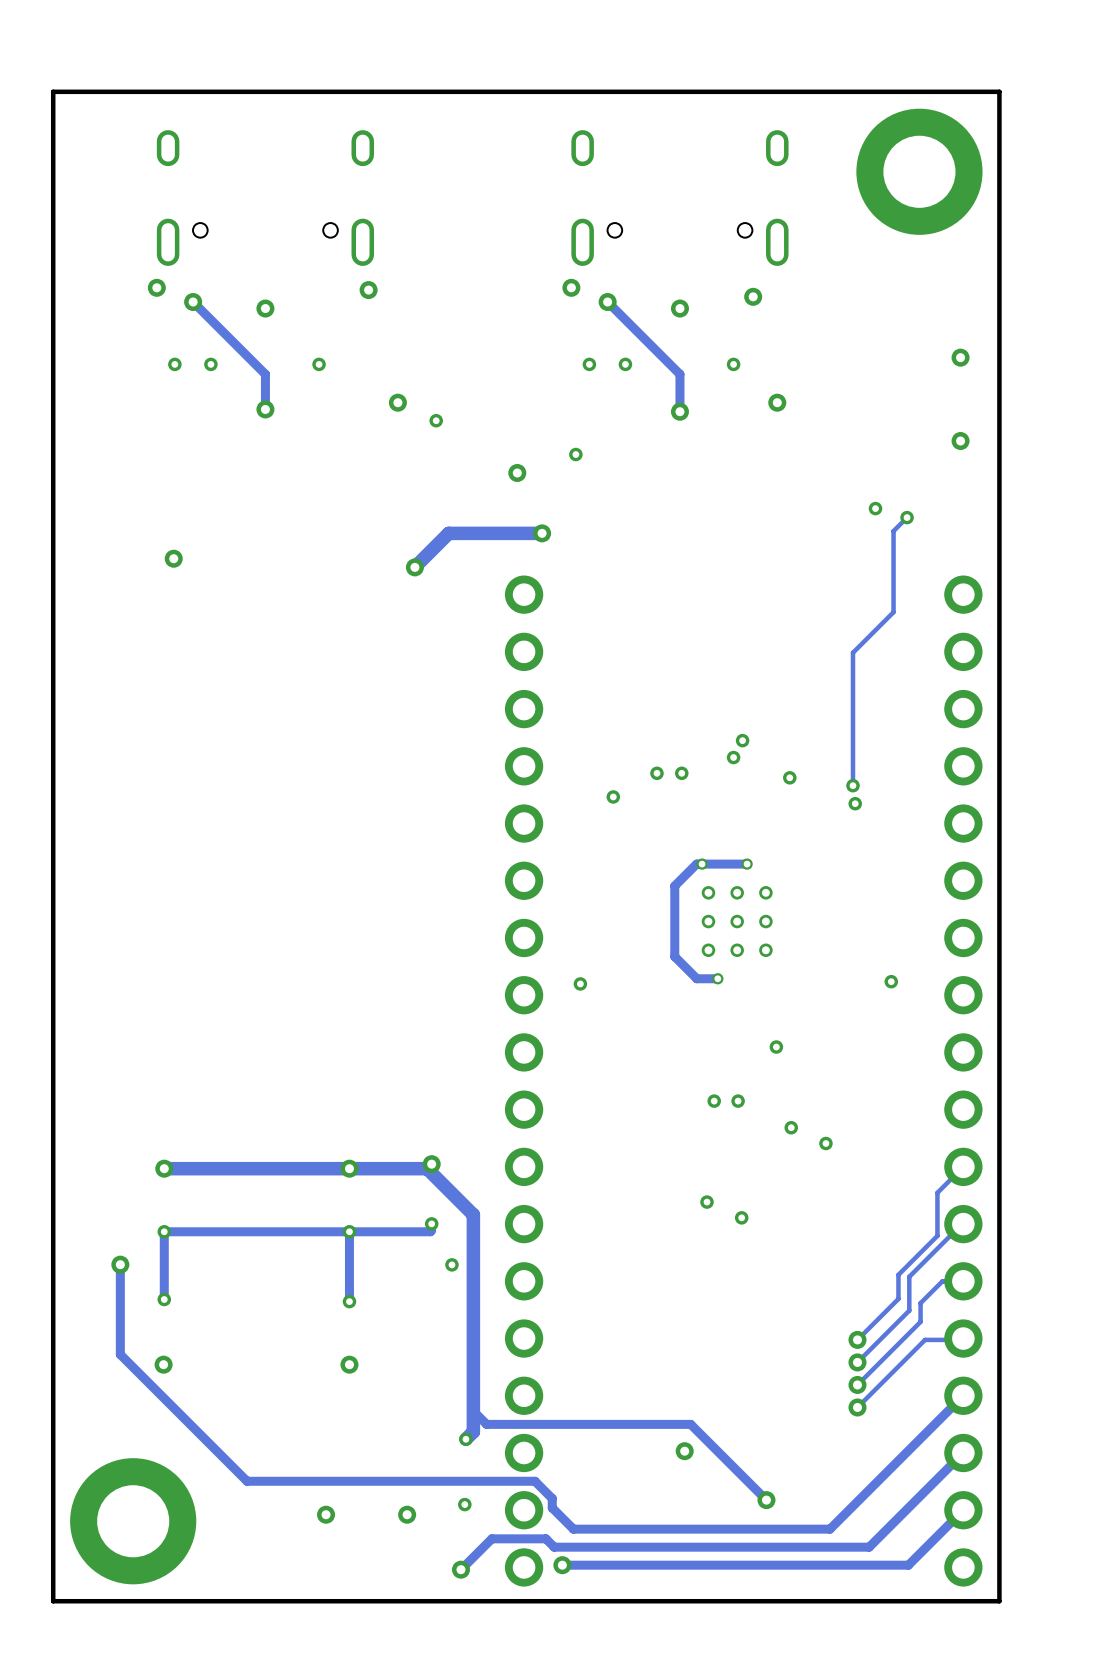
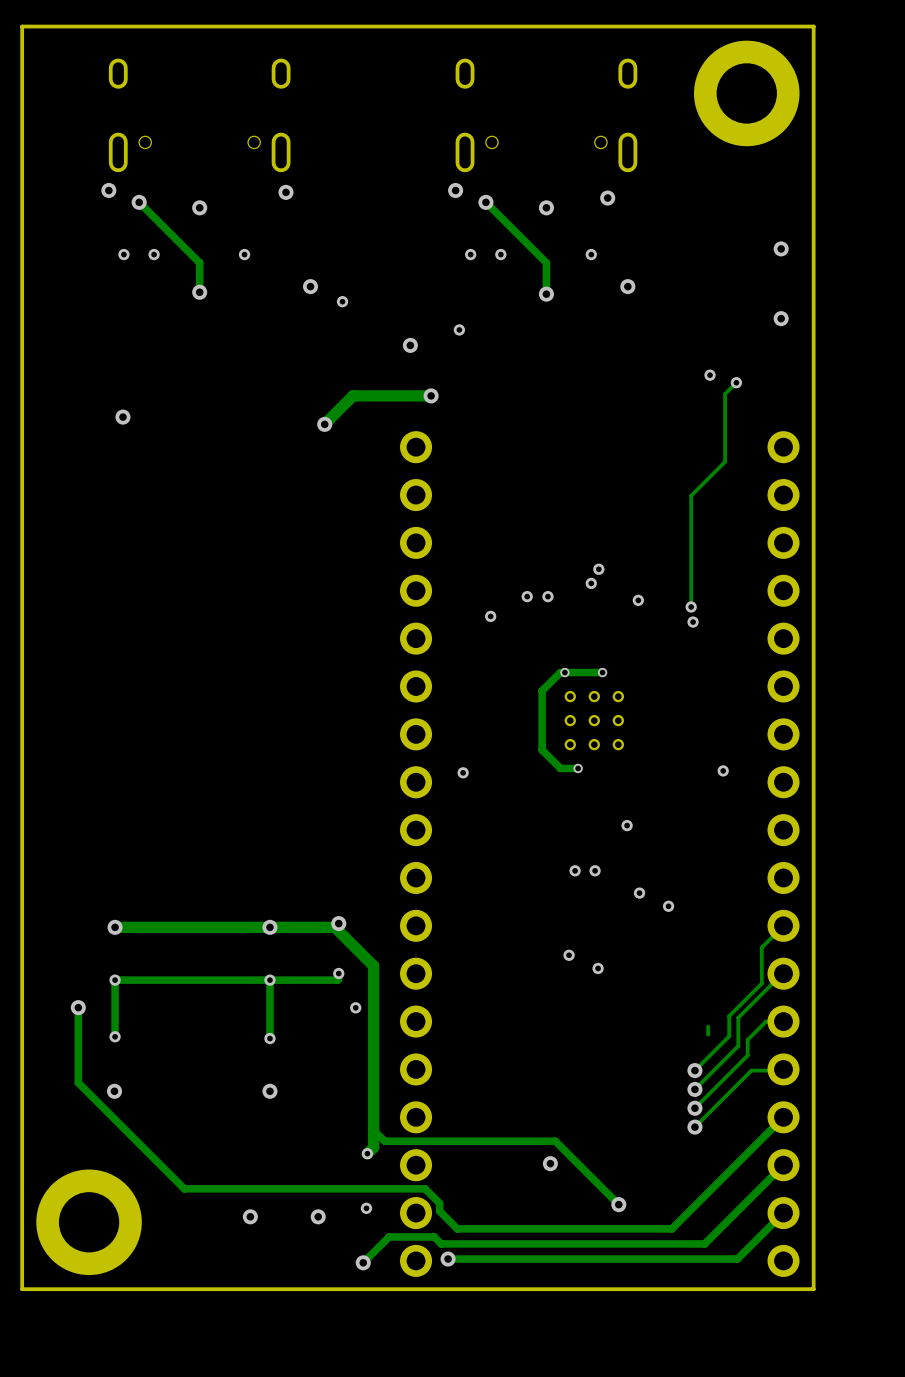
track: none -> (708, 1026) (708, 1034)

